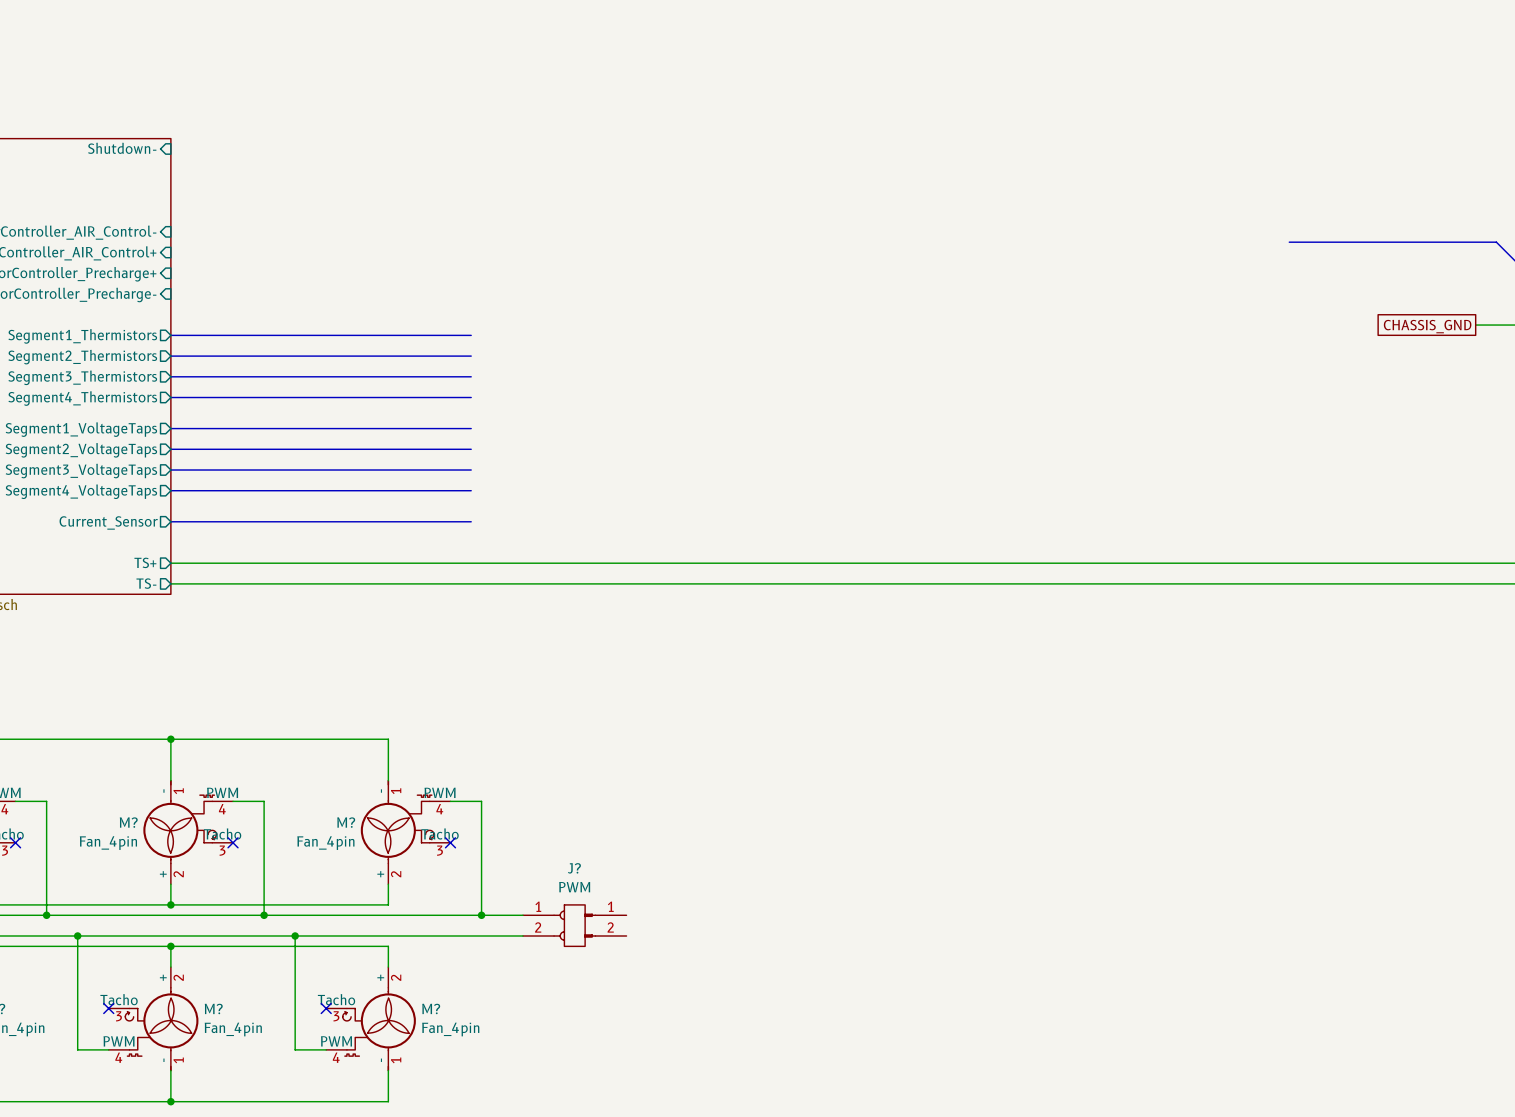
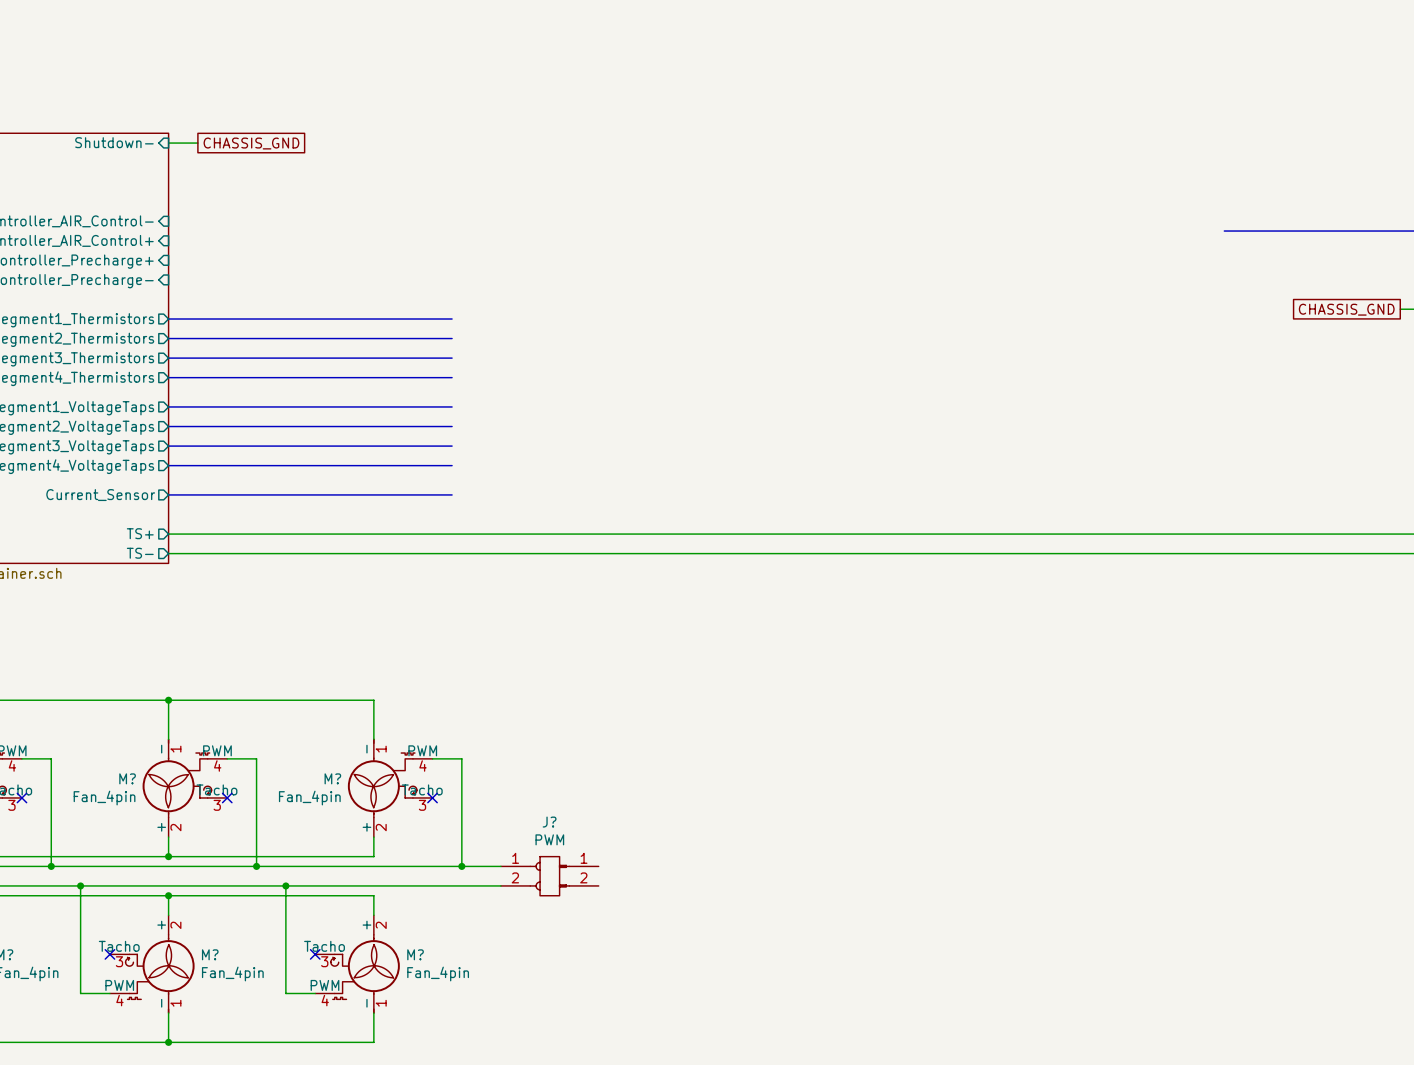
wire: none -> (168, 143) (197, 143)
global label: none -> CHASSIS_GND (251, 143)

